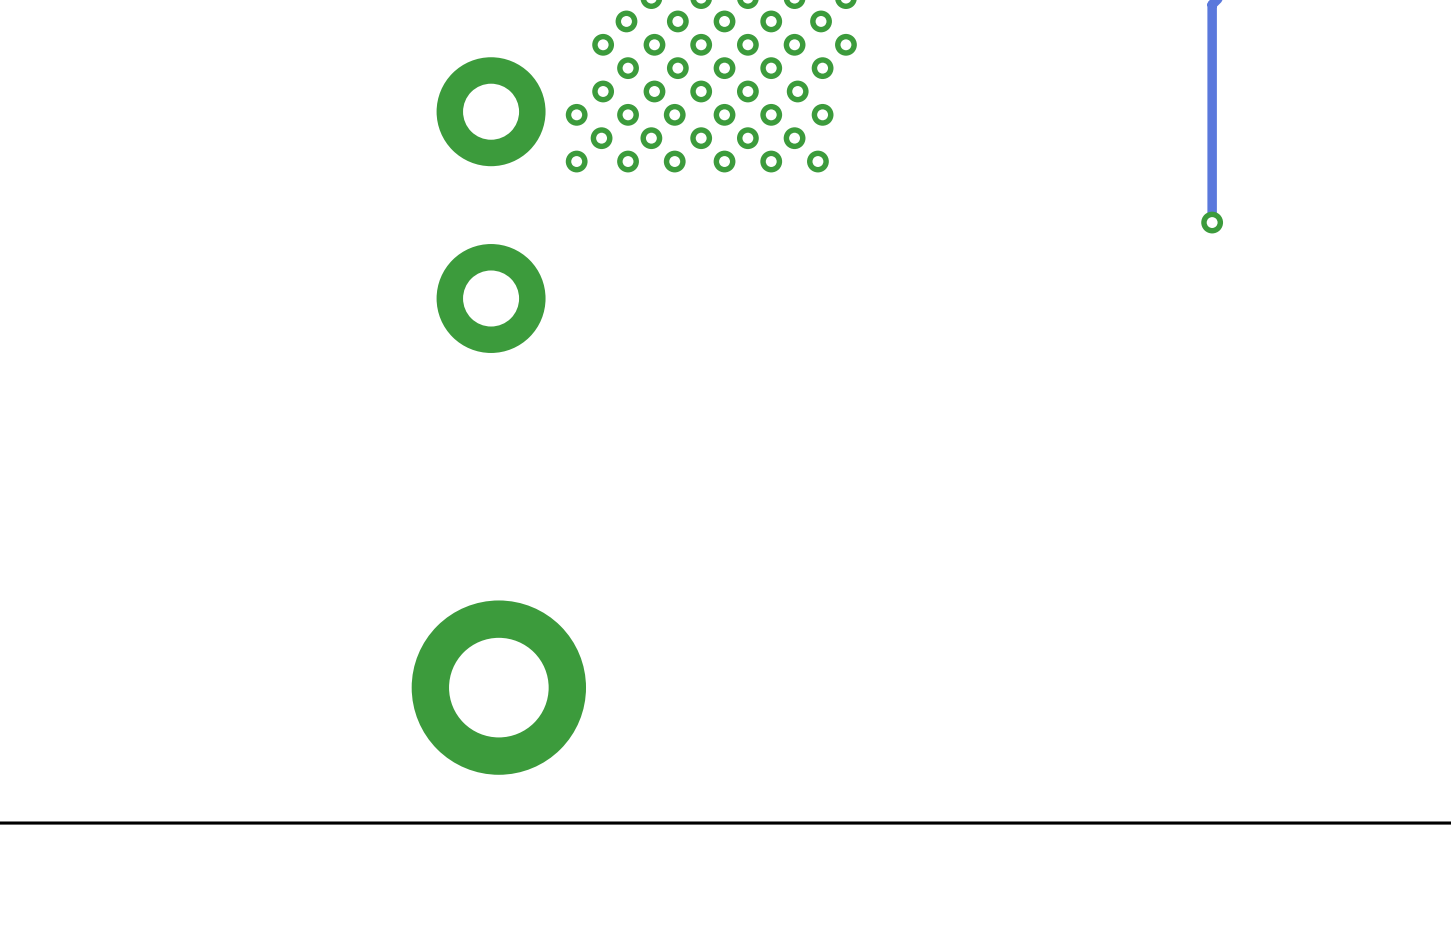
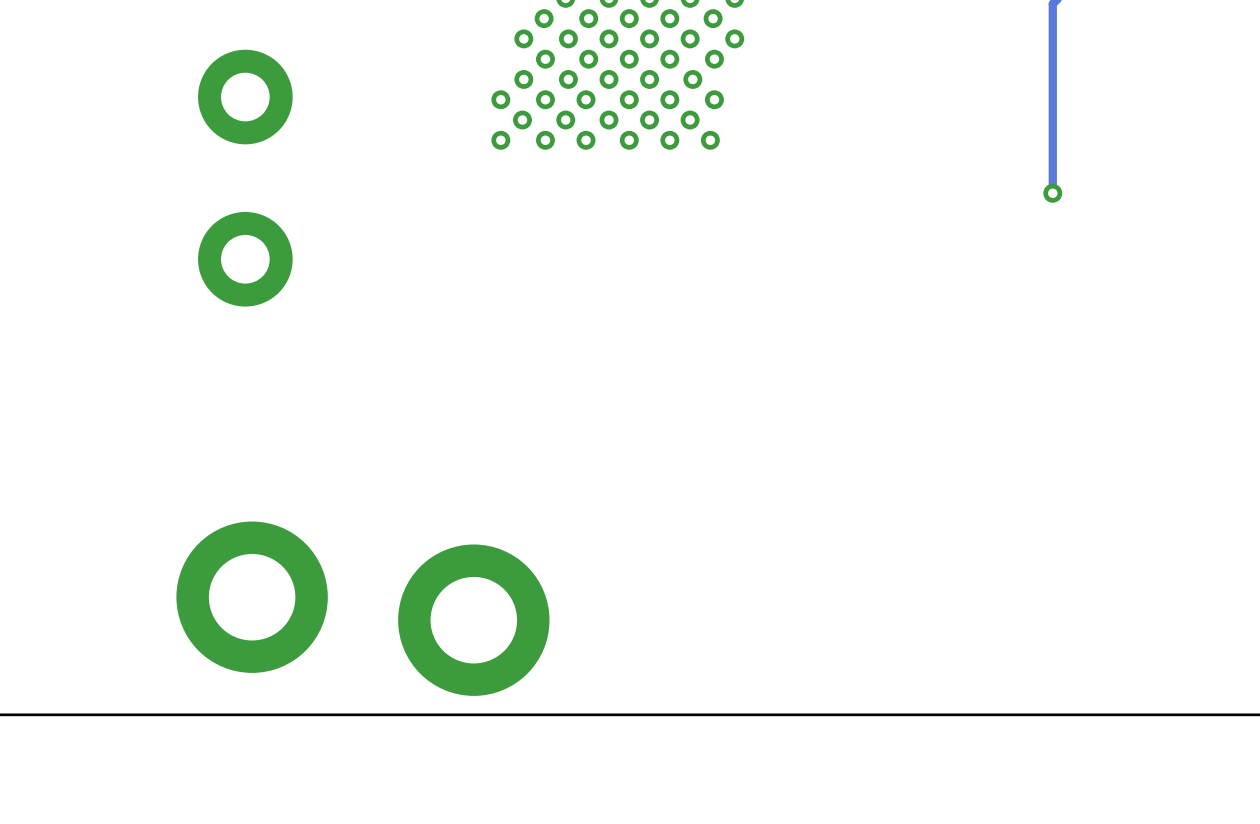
part: none -> (245, 97)
part: (491, 111) -> none
part: none -> (245, 259)
part: (491, 298) -> none
part: none -> (252, 597)
part position: (498, 687) -> (473, 620)

